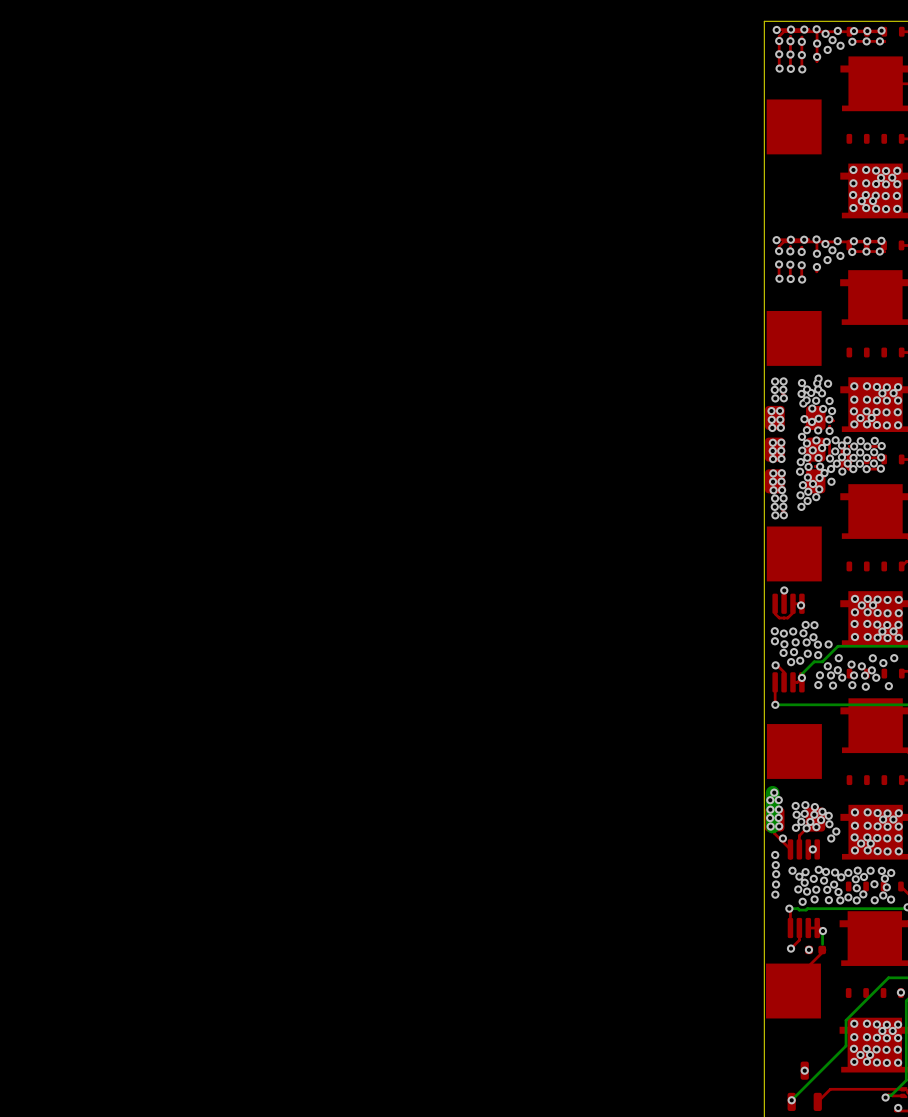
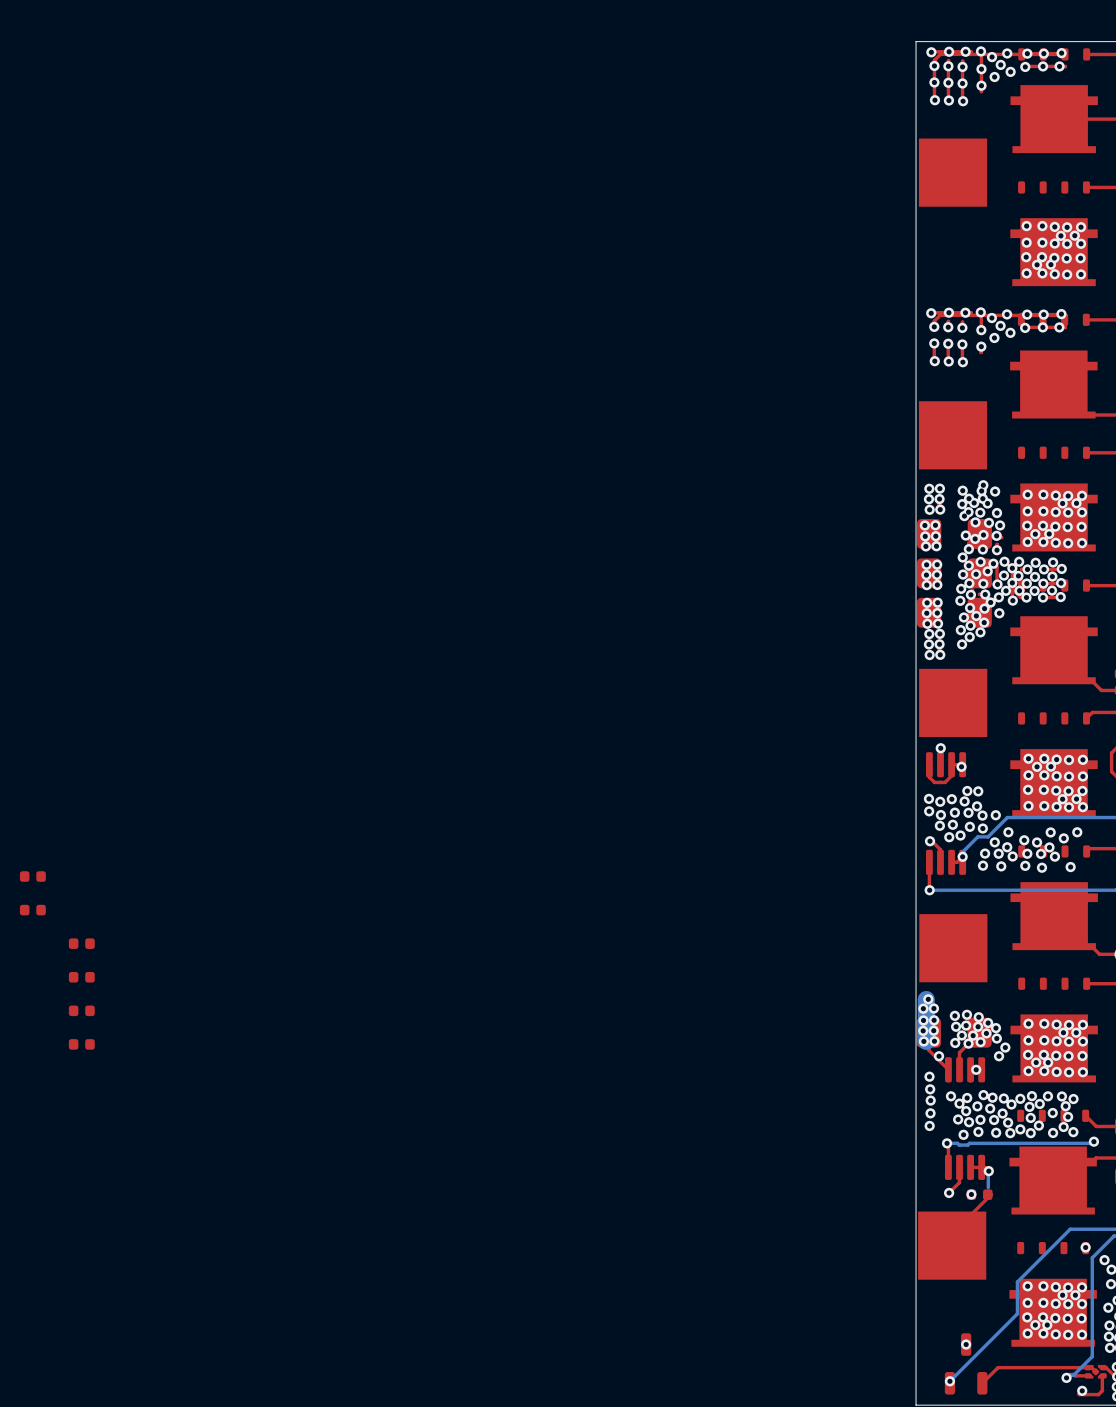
part: none -> (32, 876)
part: none -> (32, 910)
part: none -> (81, 943)
part: none -> (81, 977)
part: none -> (81, 1010)
part: none -> (81, 1044)

